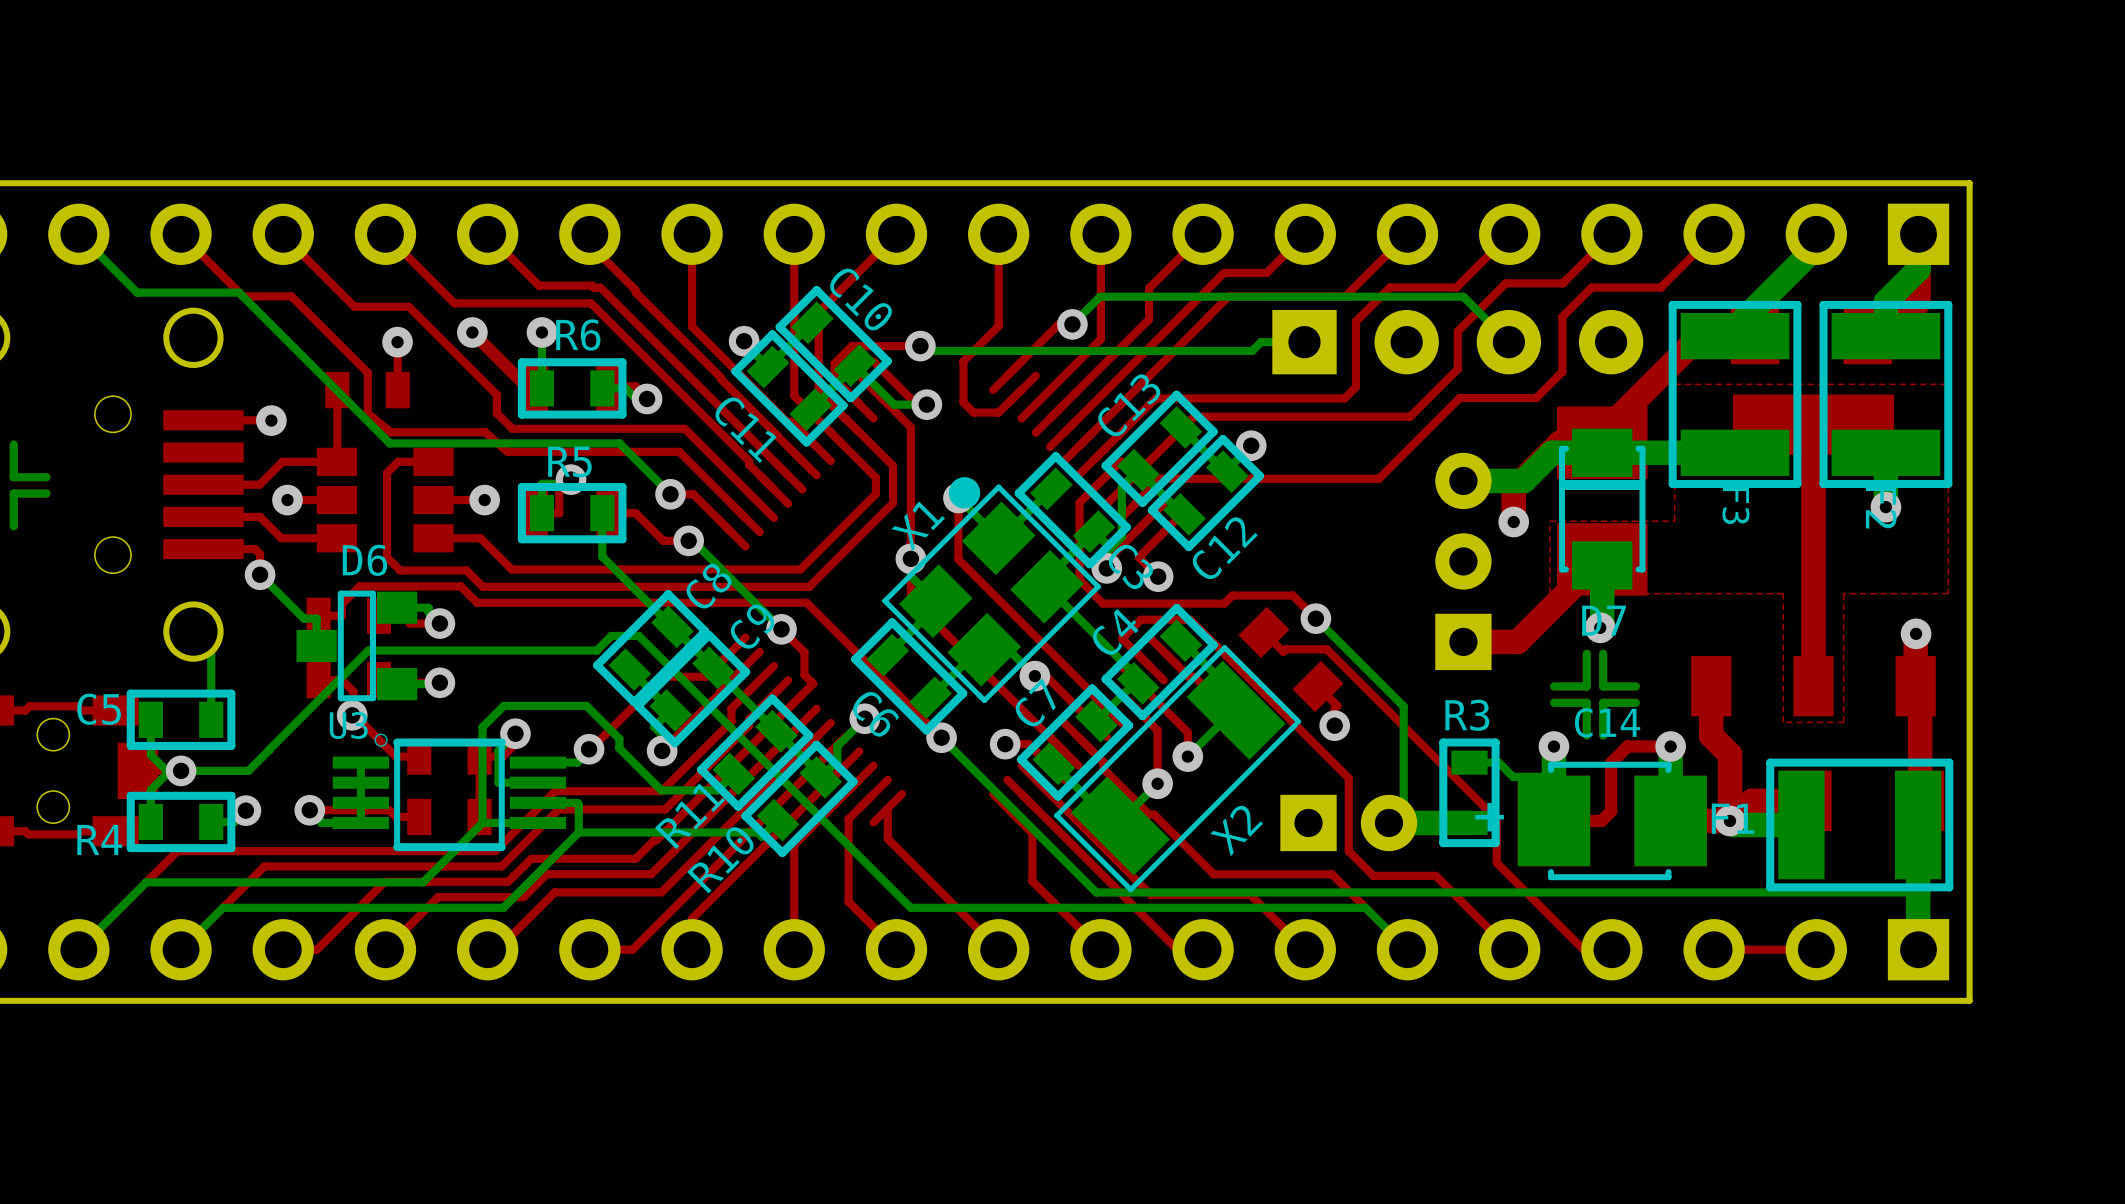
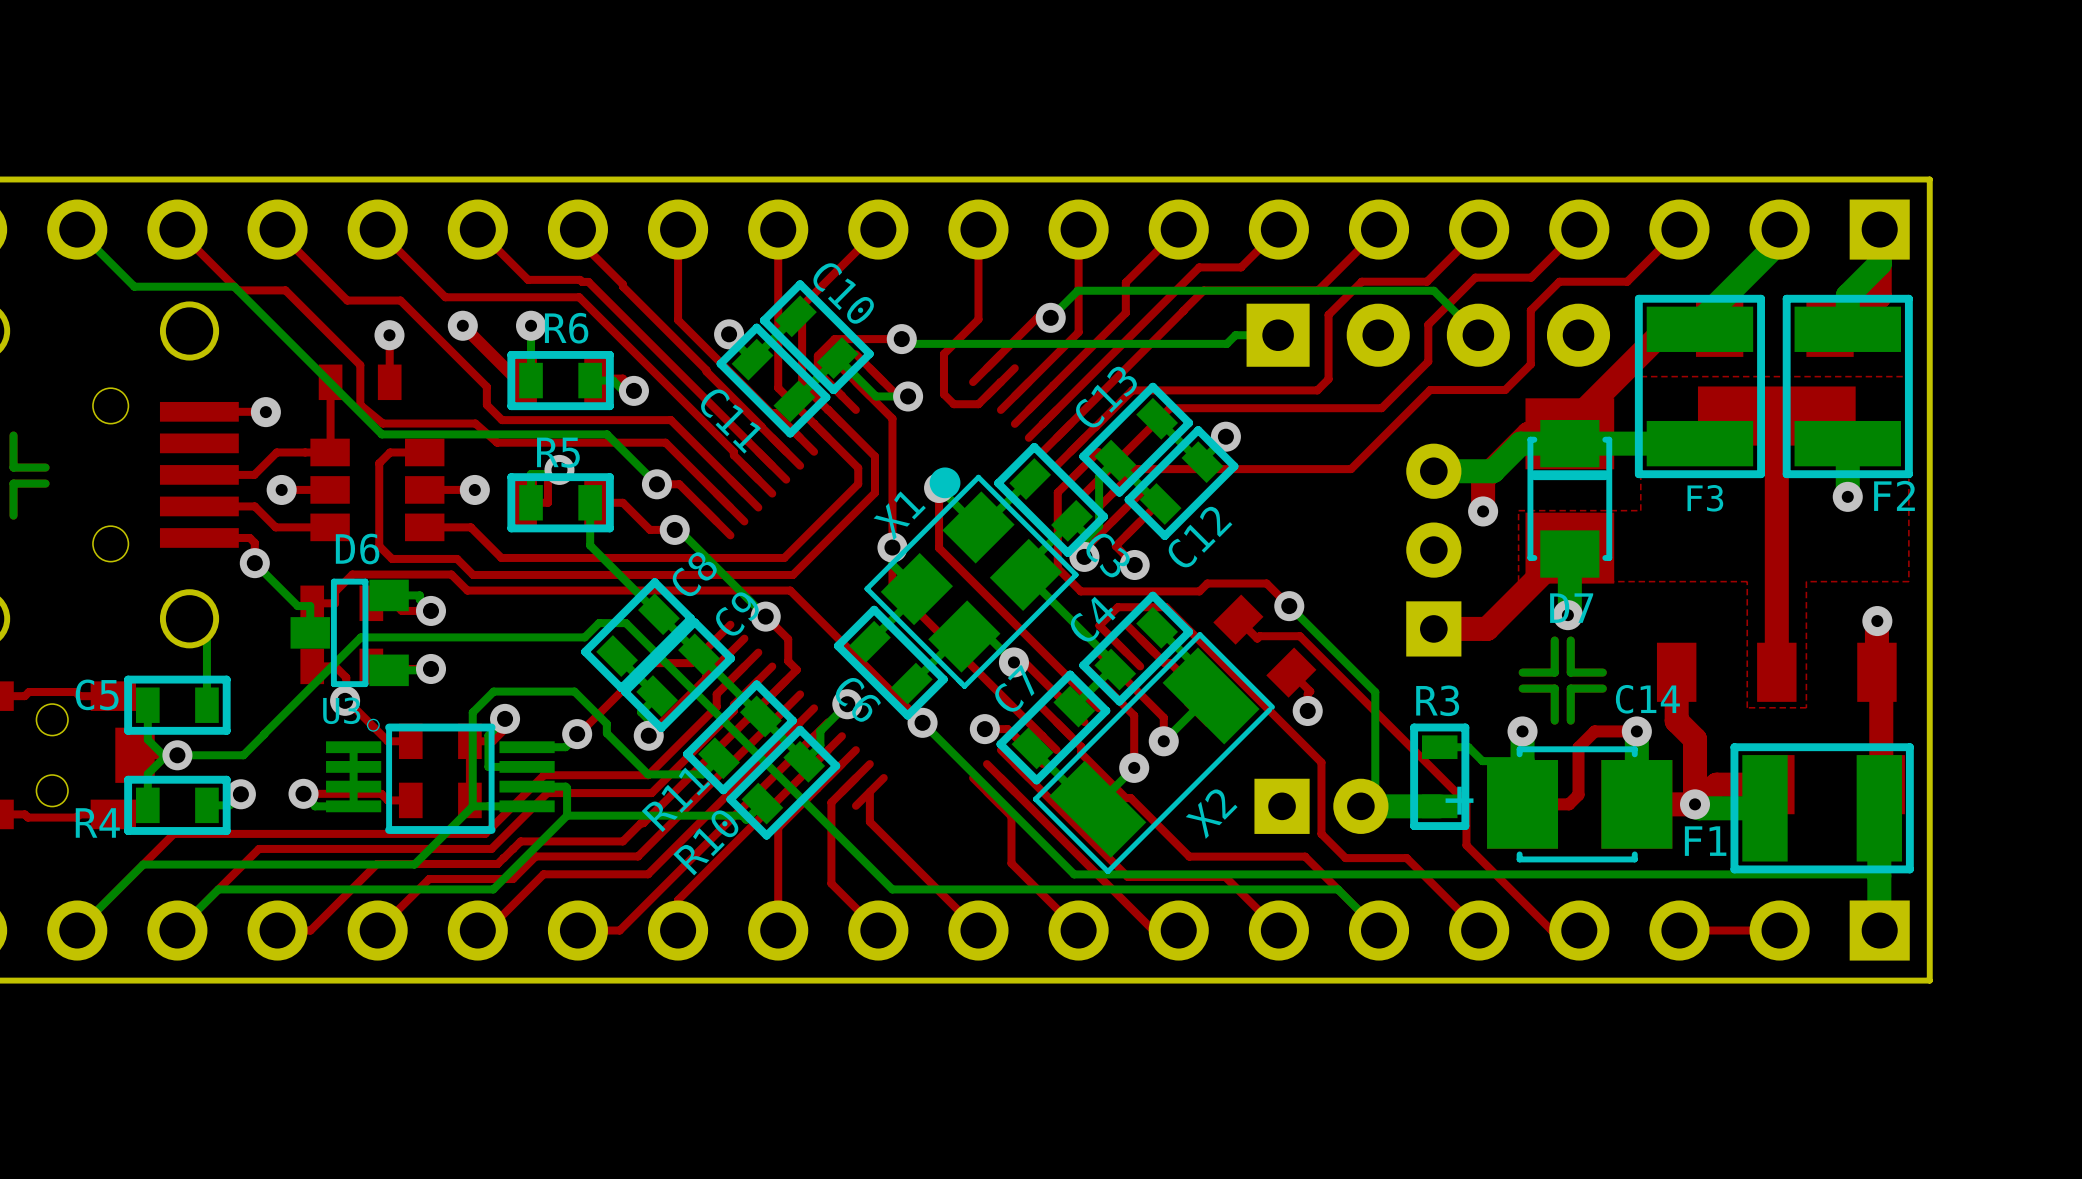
F3 name rotation: 0° (1735, 505) -> 90° counterclockwise (1705, 498)
F2 name rotation: 0° (1881, 507) -> 90° counterclockwise (1894, 495)
C14 name position: C14 (1607, 722) -> C14 (1647, 699)
F1 name position: F1 (1732, 818) -> F1 (1705, 841)

